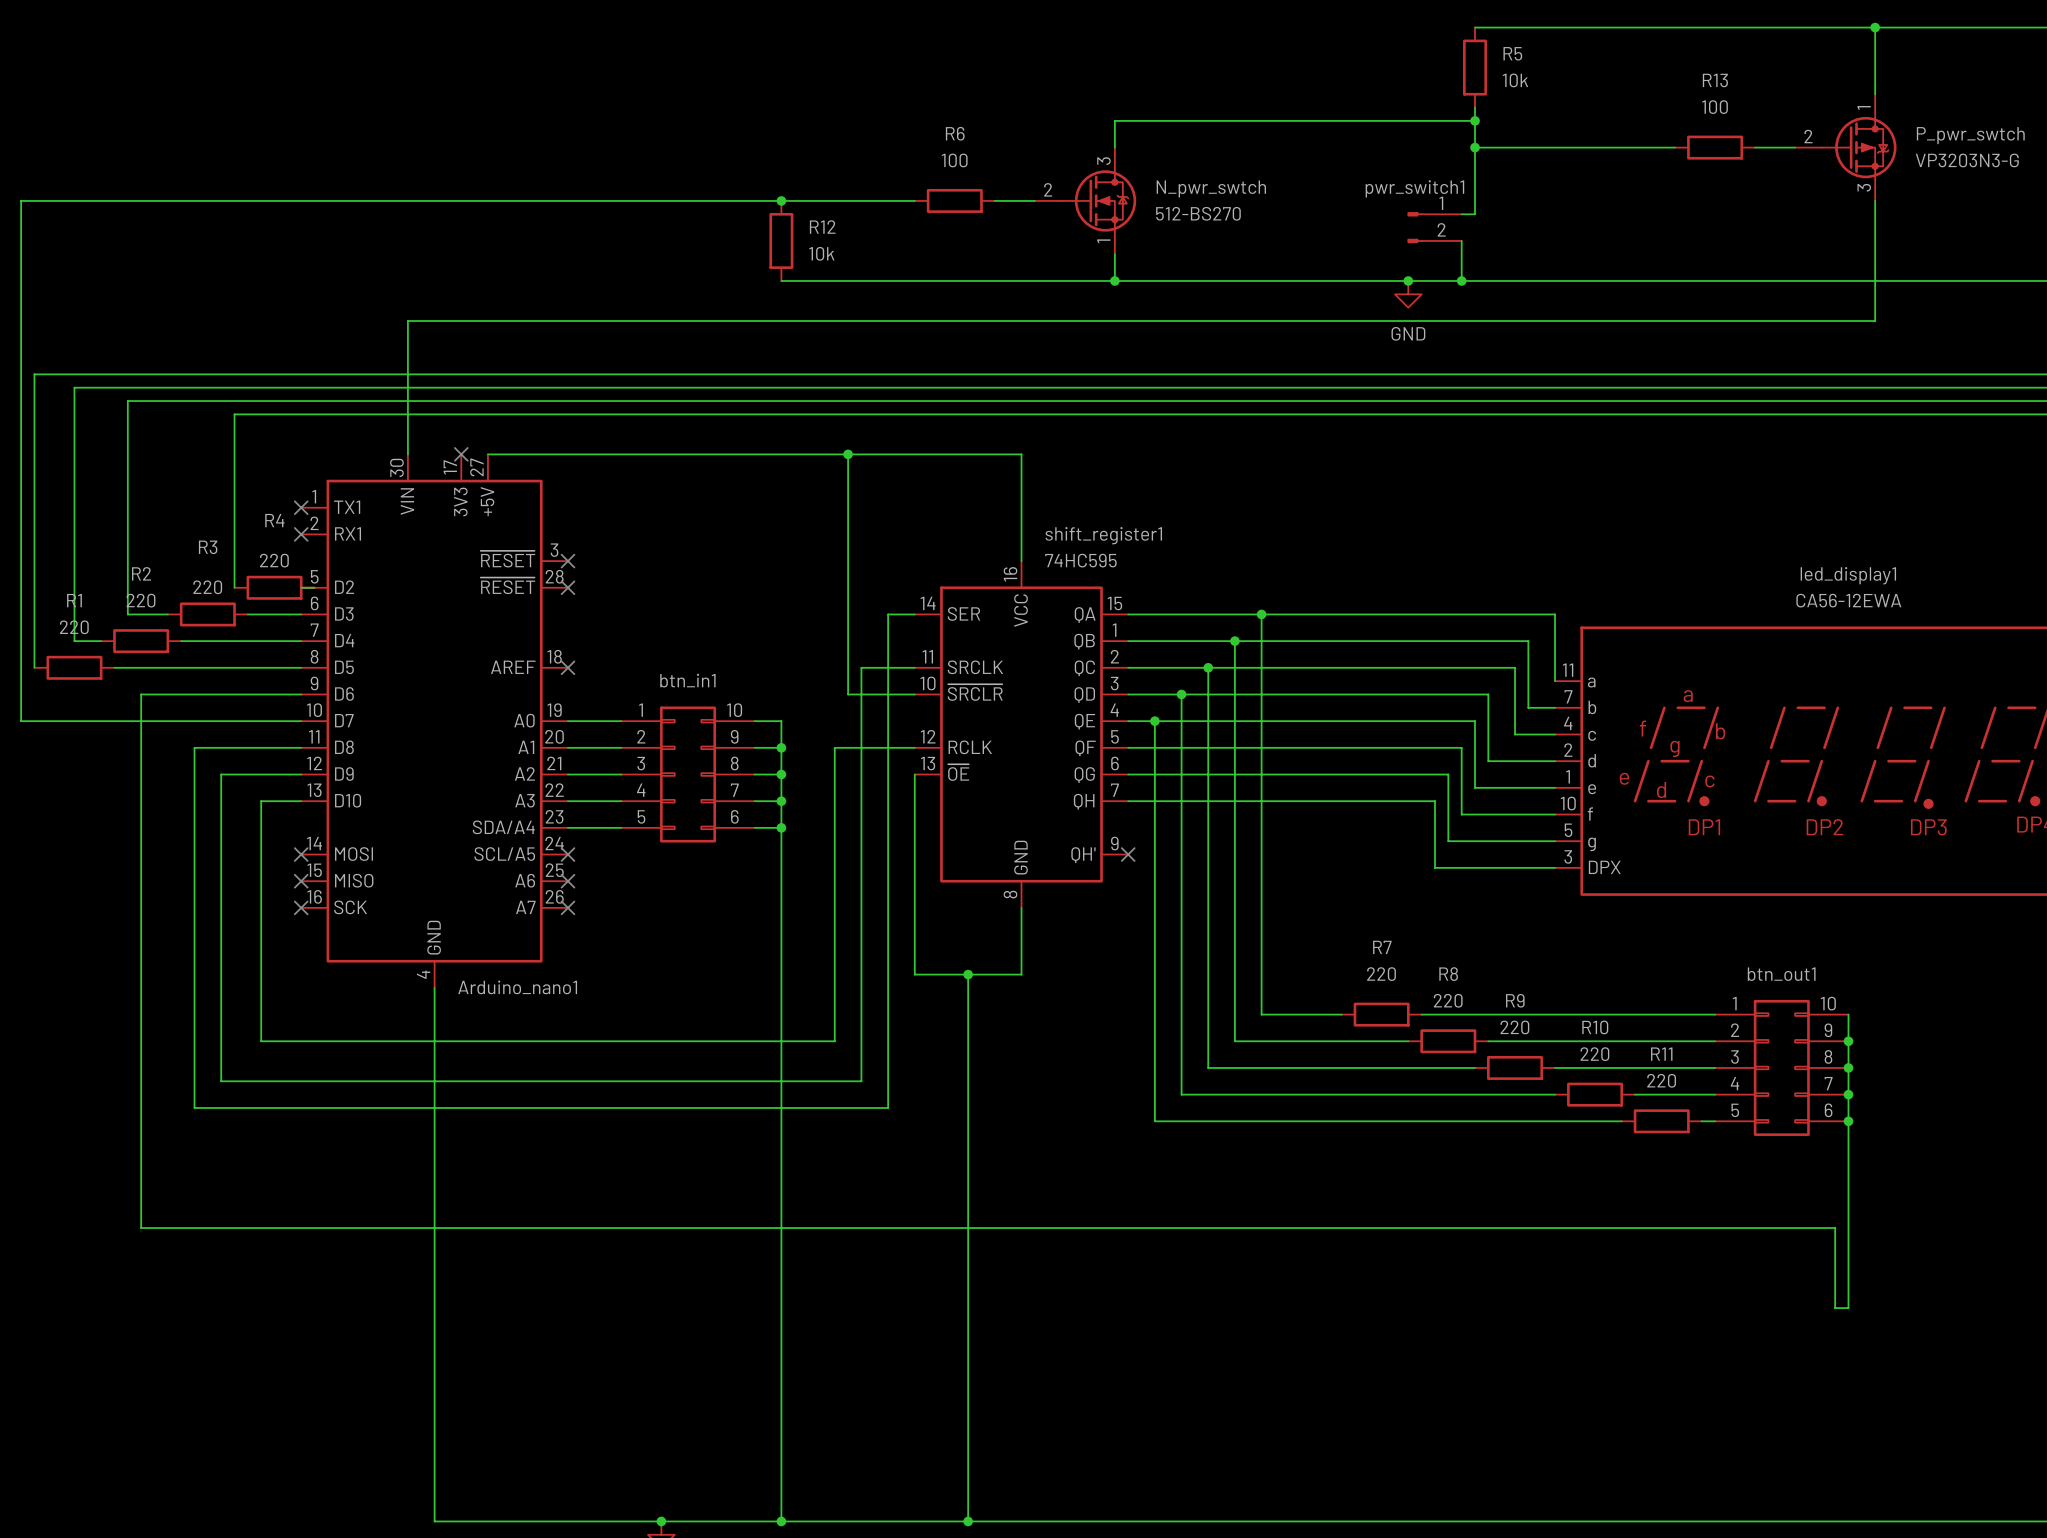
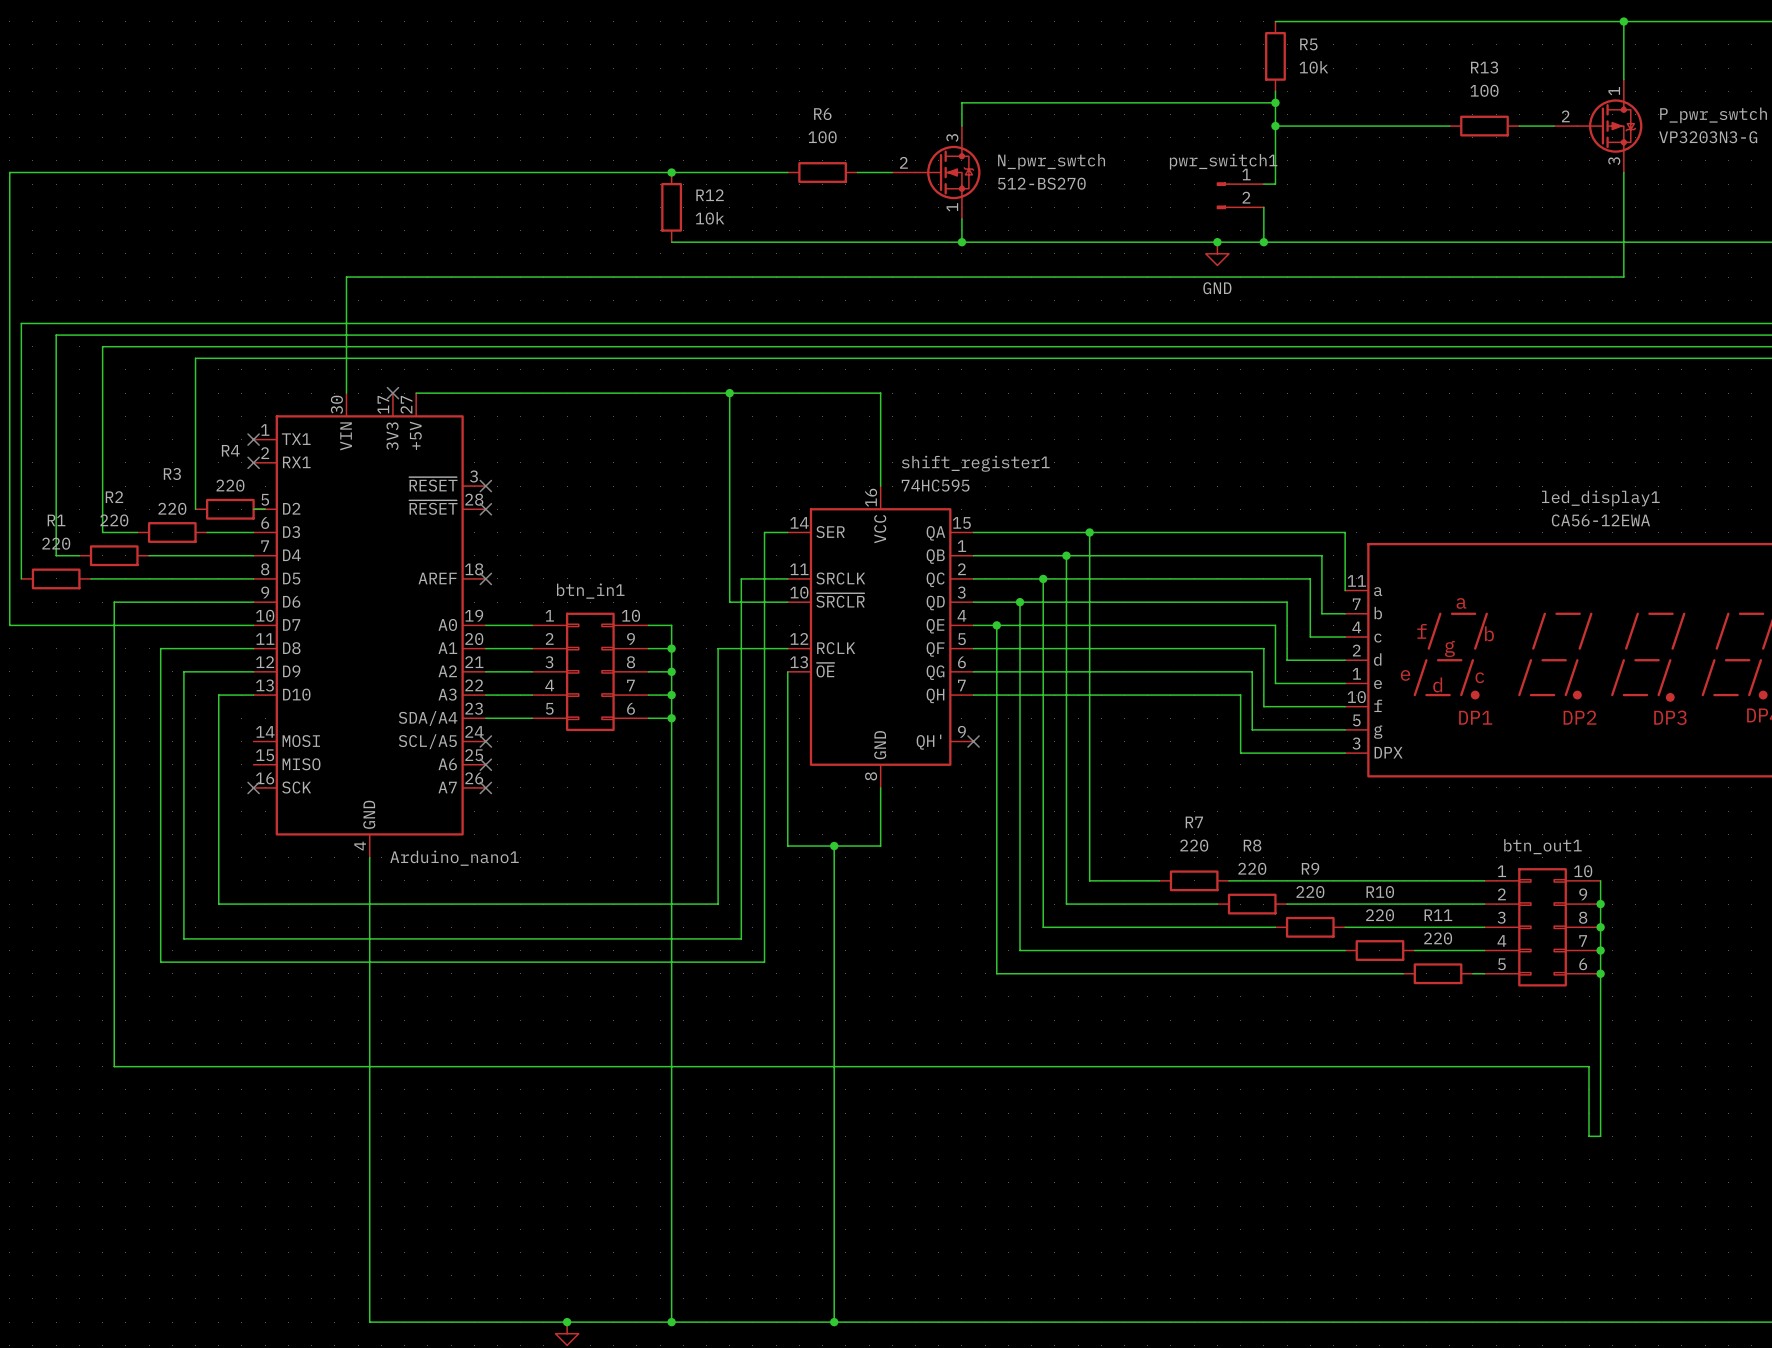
no-connect mark: (301, 854) -> none
no-connect mark: (301, 881) -> none

